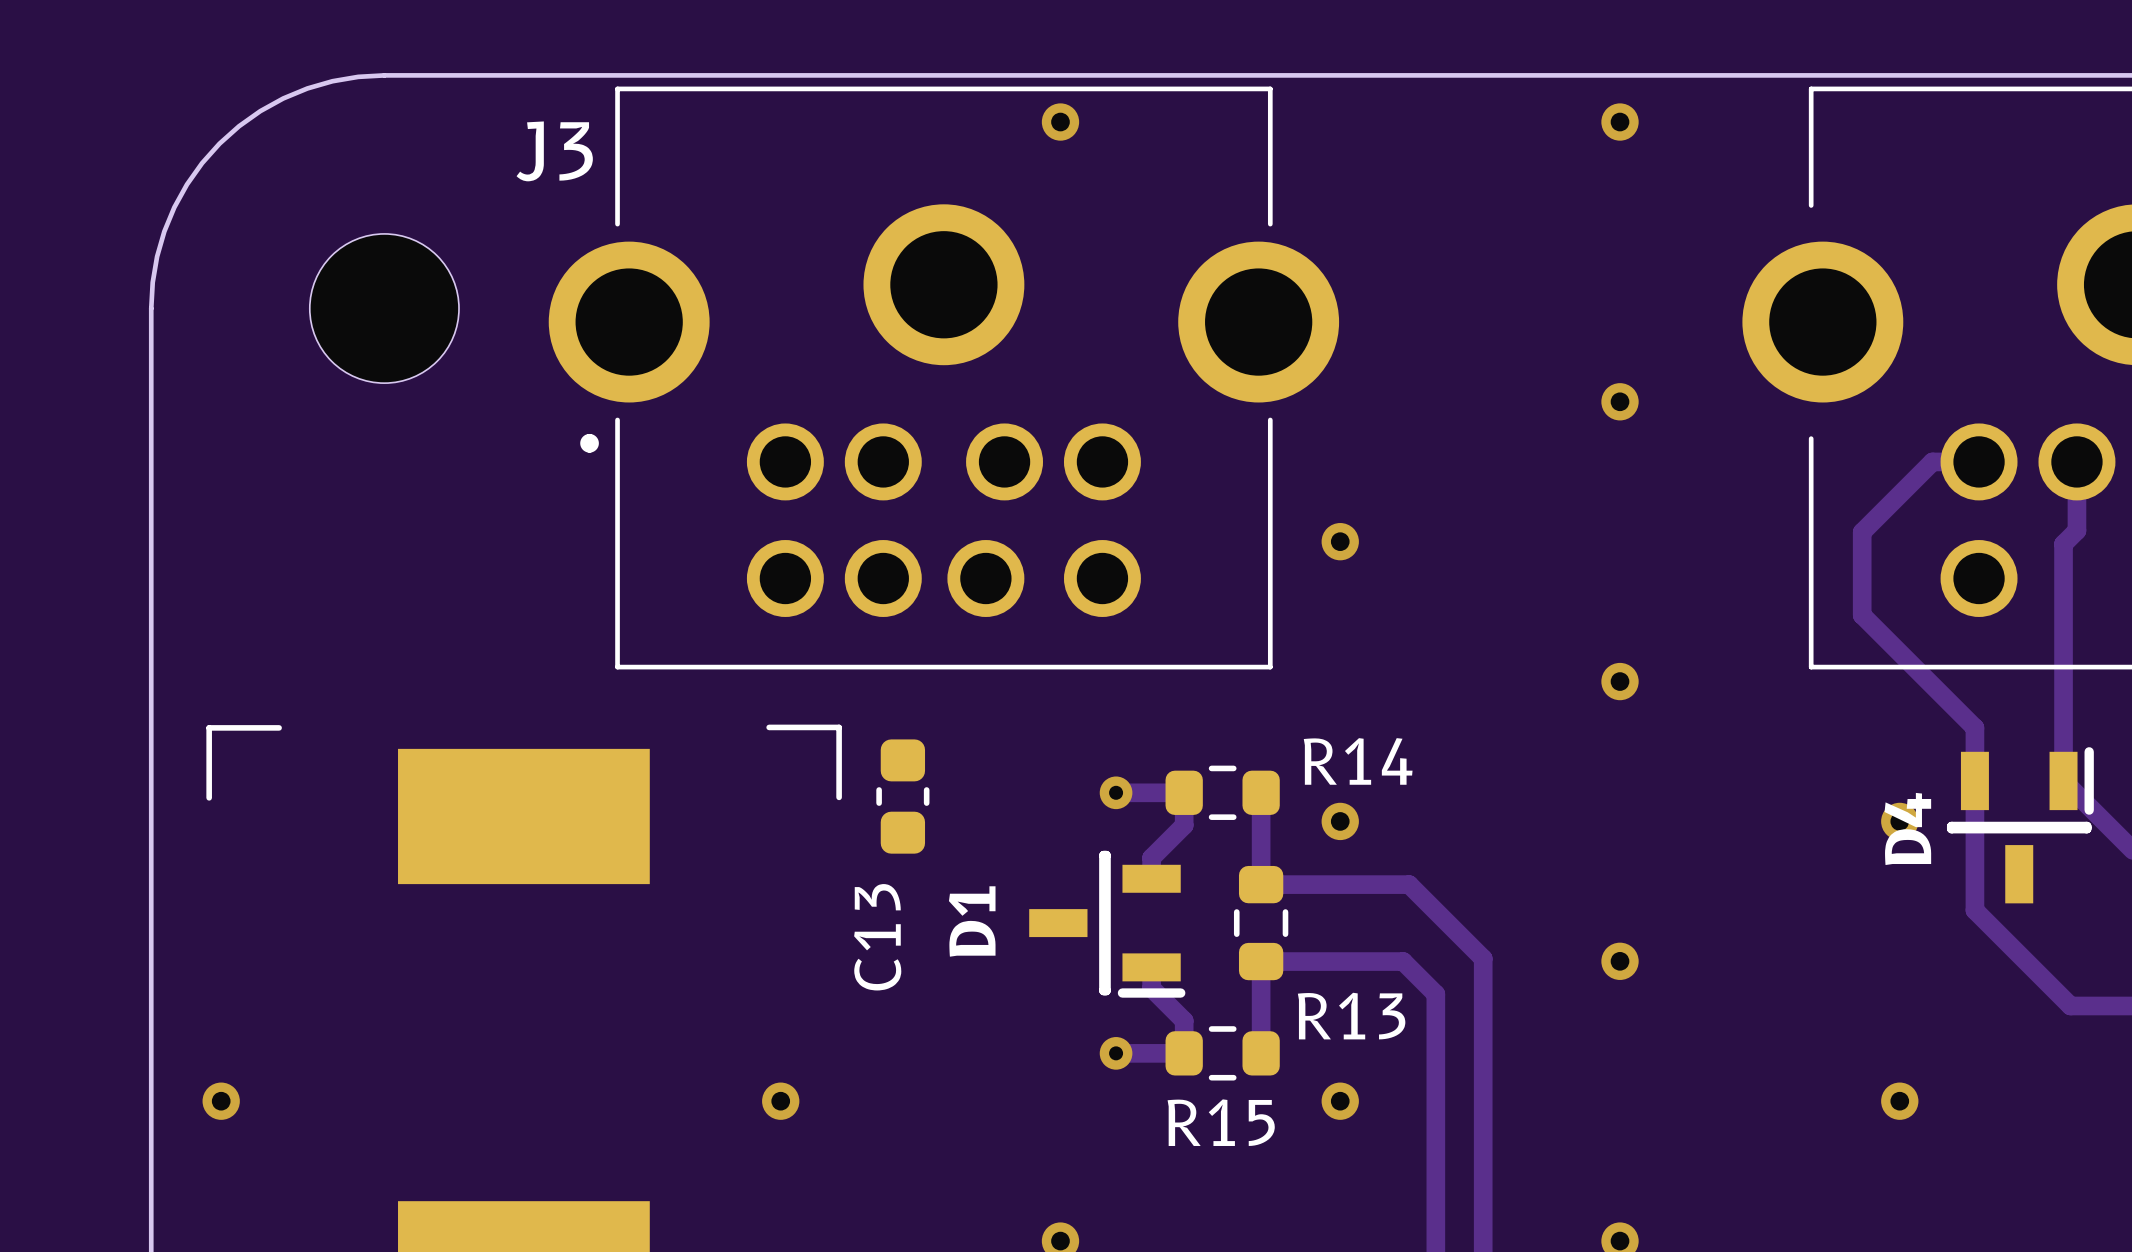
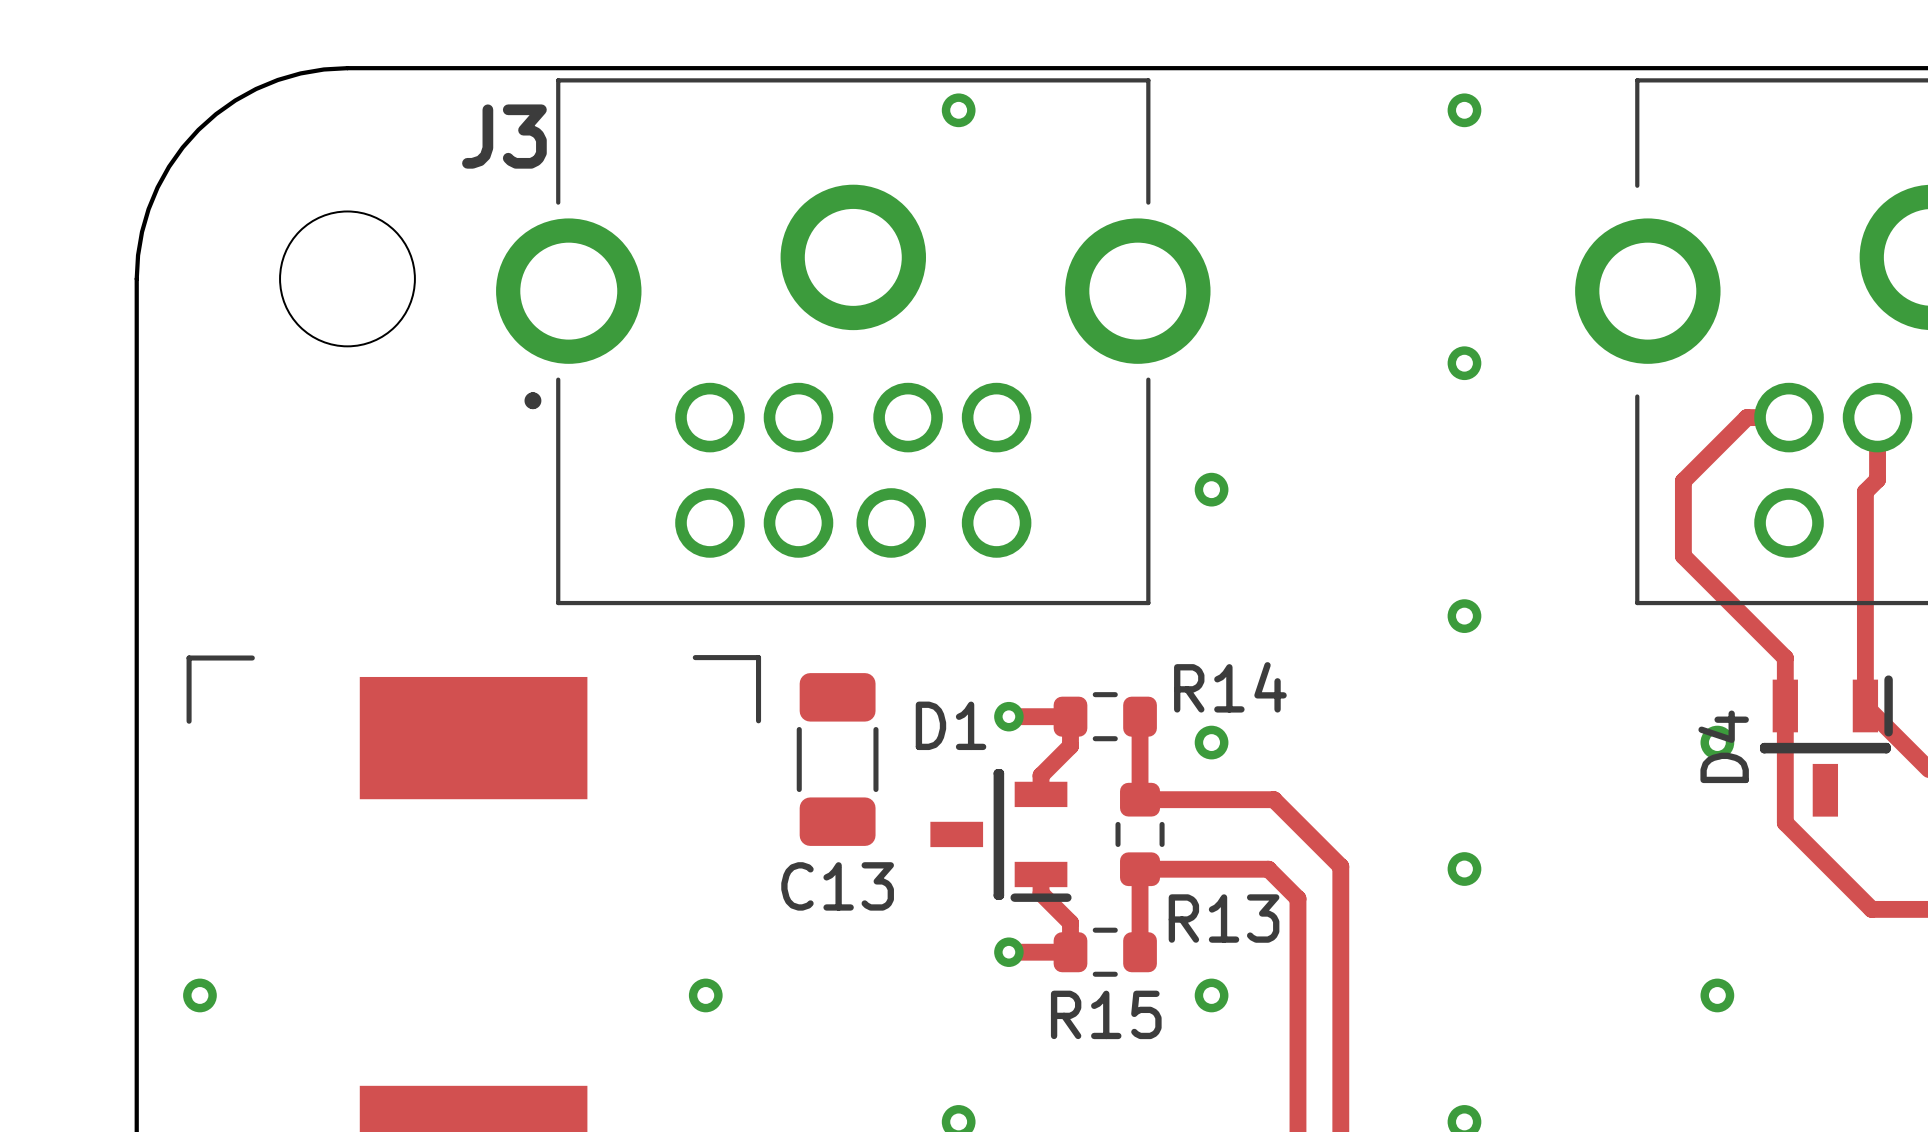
C13 footprint: [876, 739, 930, 854] -> [796, 673, 879, 846]
D1 name rotation: 0° (972, 921) -> 90° clockwise (951, 725)
D1 name position: D1 (972, 921) -> D1 (951, 725)

